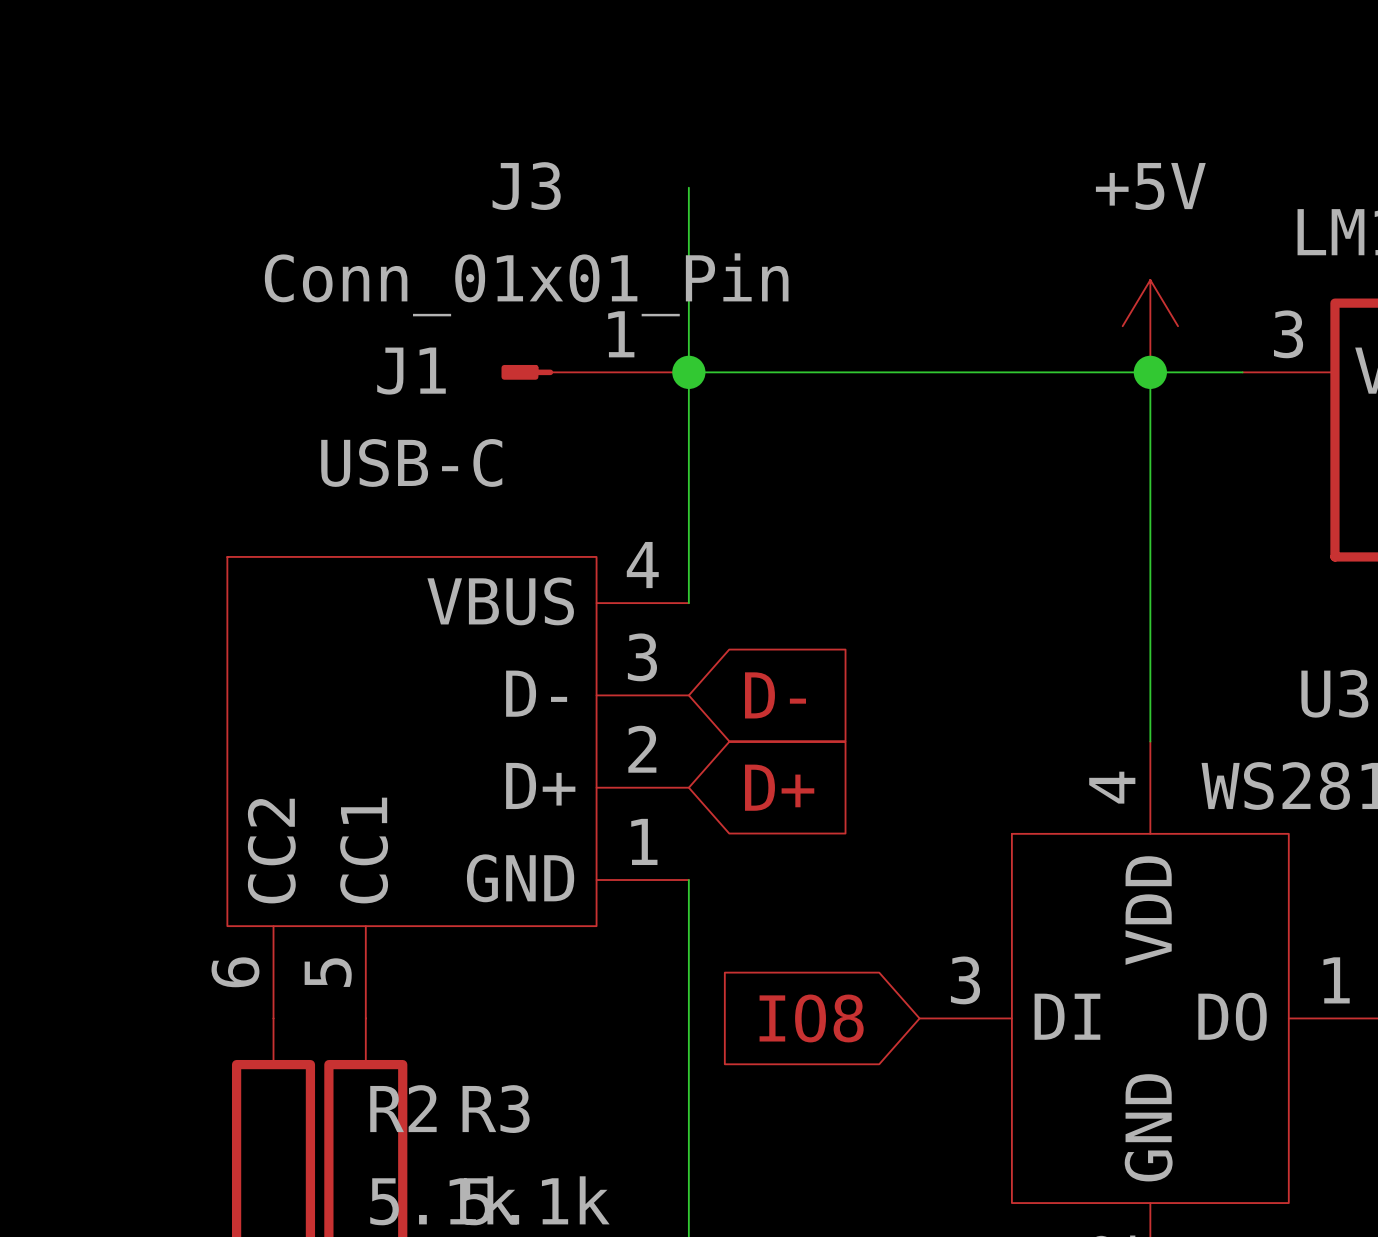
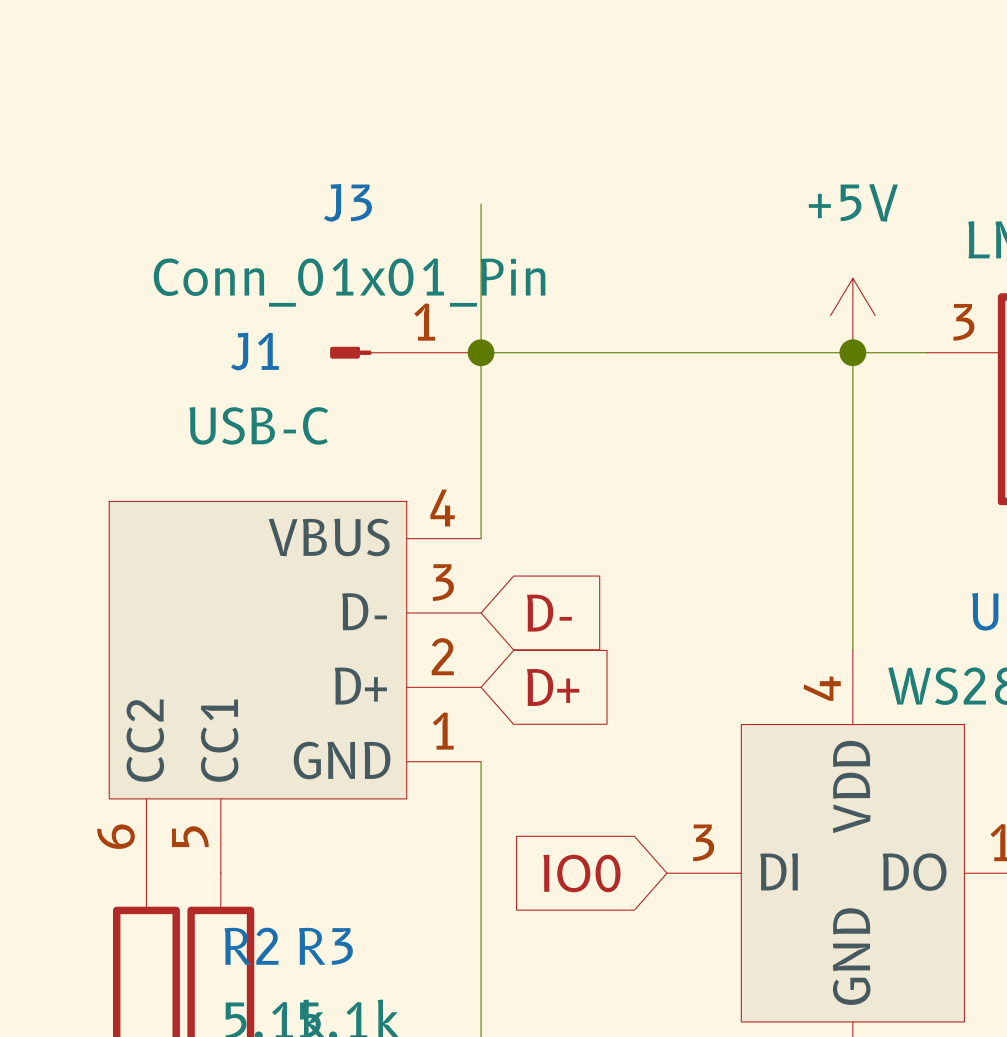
global label: IO8 (811, 1018) -> IO0 (581, 873)

